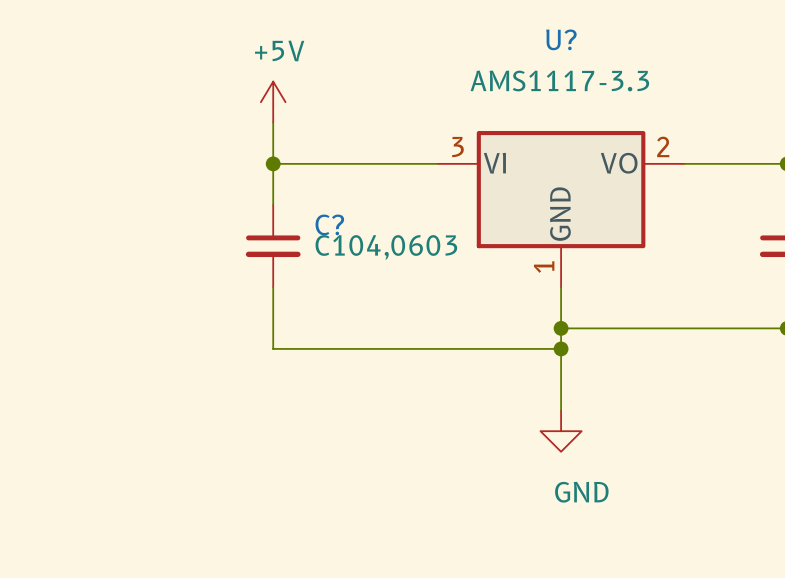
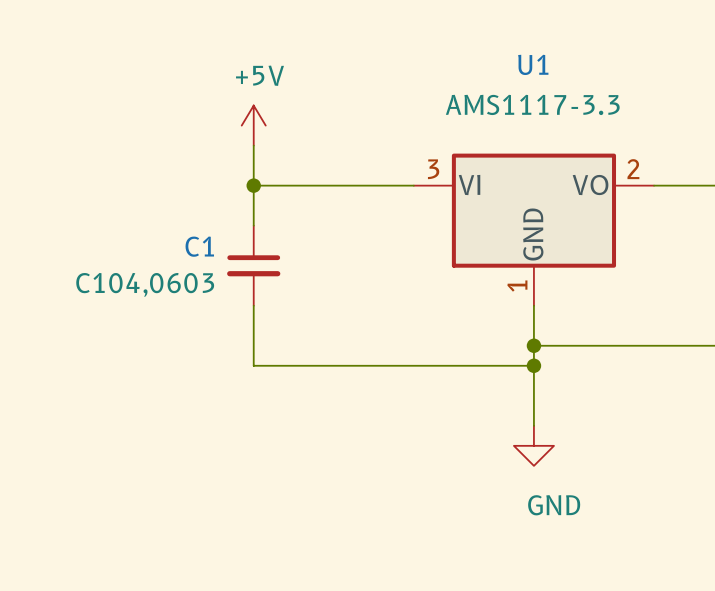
U? name: U? (561, 39) -> U1 (533, 64)
C? name: C? (329, 224) -> C1 (199, 246)
C? value position: C104,0603 (386, 247) -> C104,0603 (145, 284)

